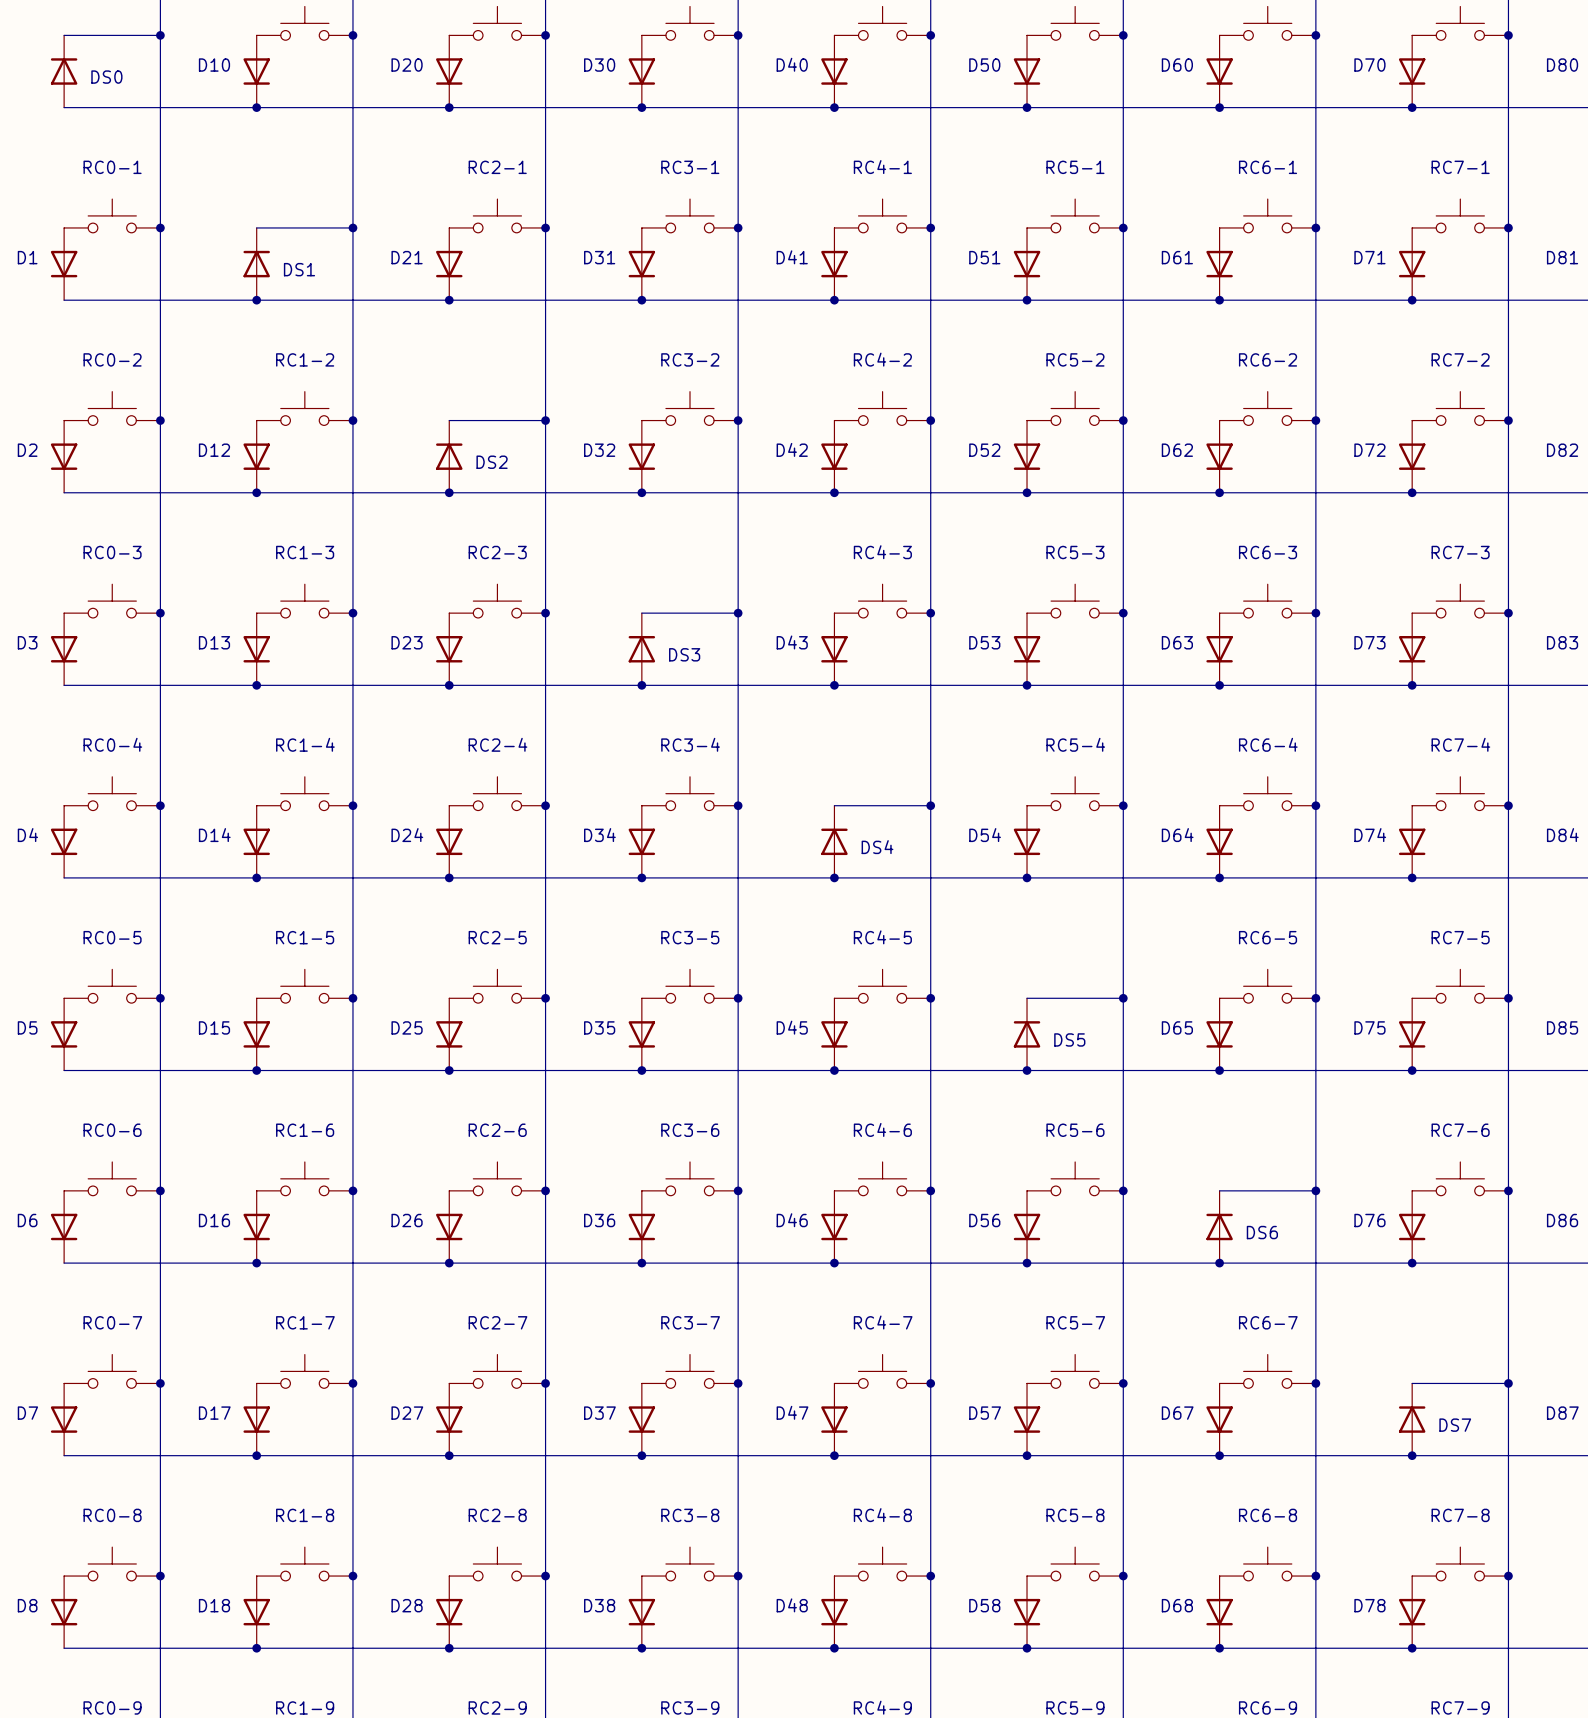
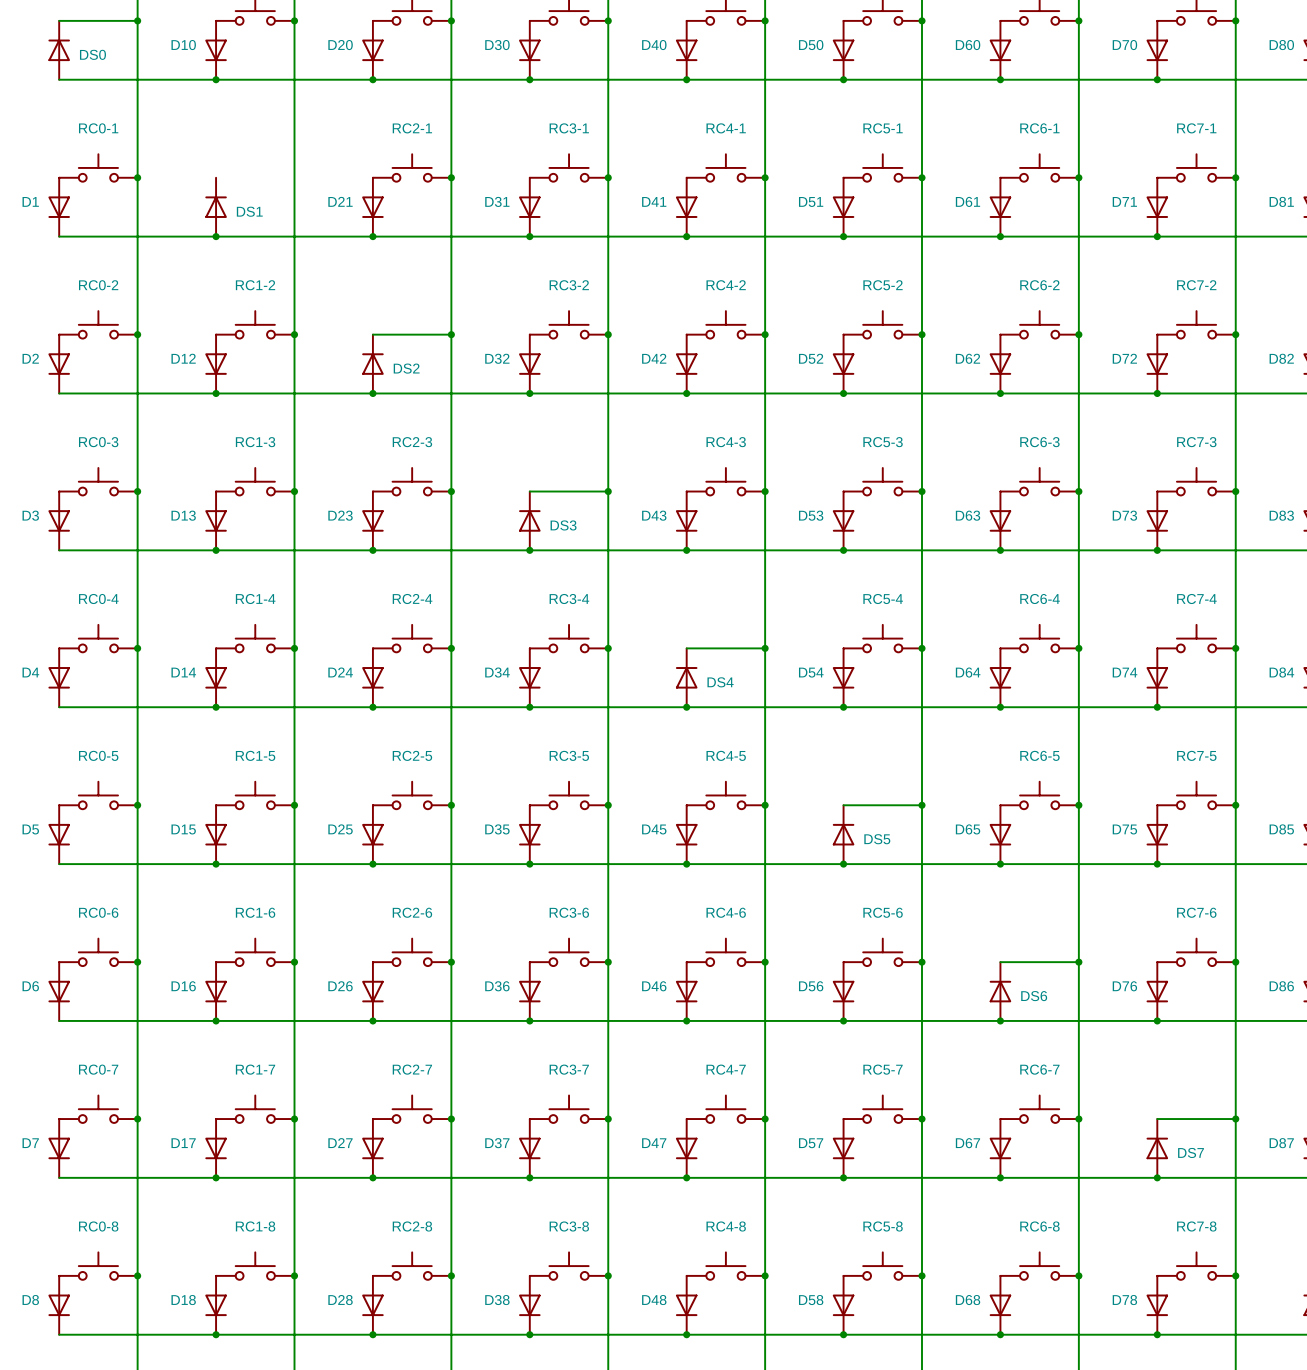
wire: (256, 227) (352, 227) -> none
junction: (352, 227) -> none

